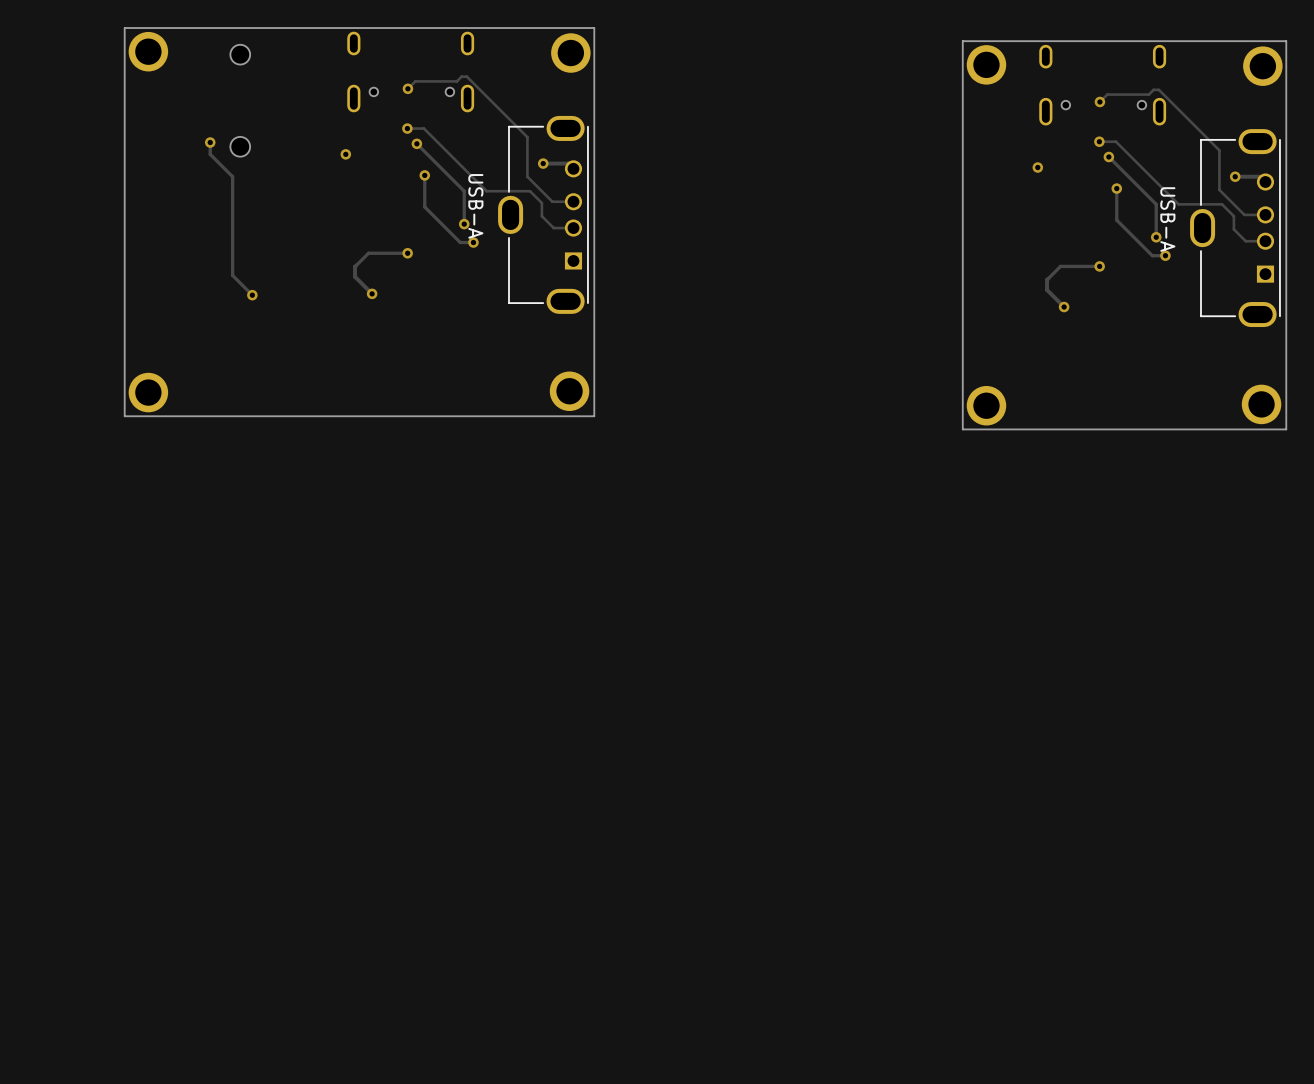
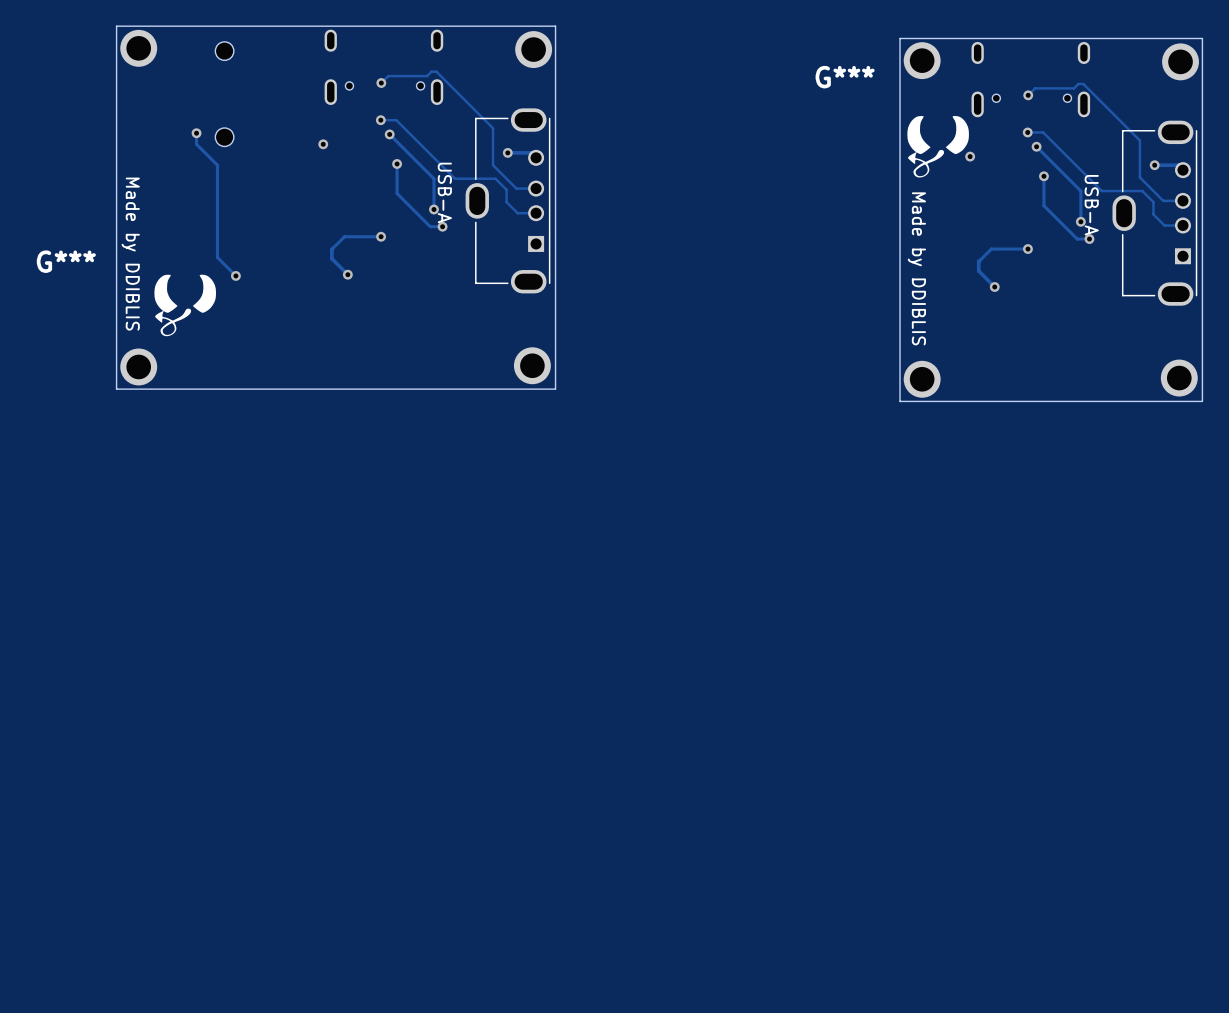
G***: none -> (938, 146)
text: none -> Made by DDIBLIS (130, 254)
text: none -> Made by DDIBLIS (916, 268)
G***: none -> (185, 305)

